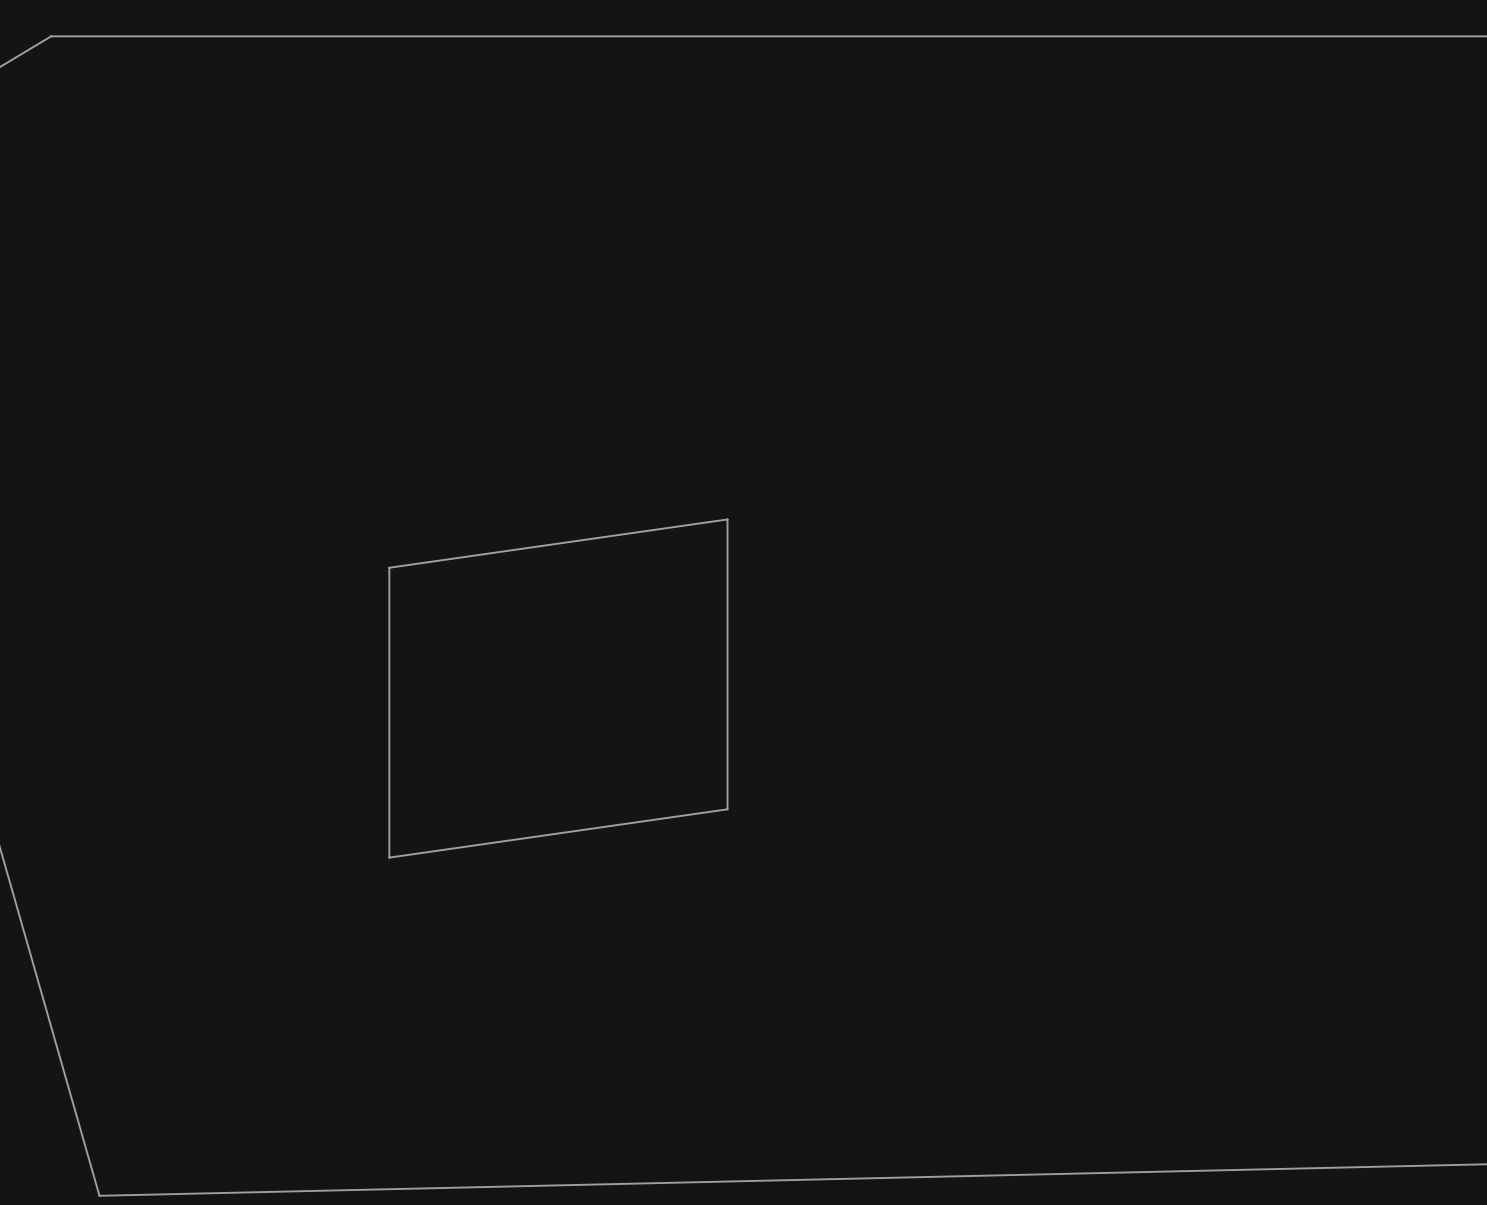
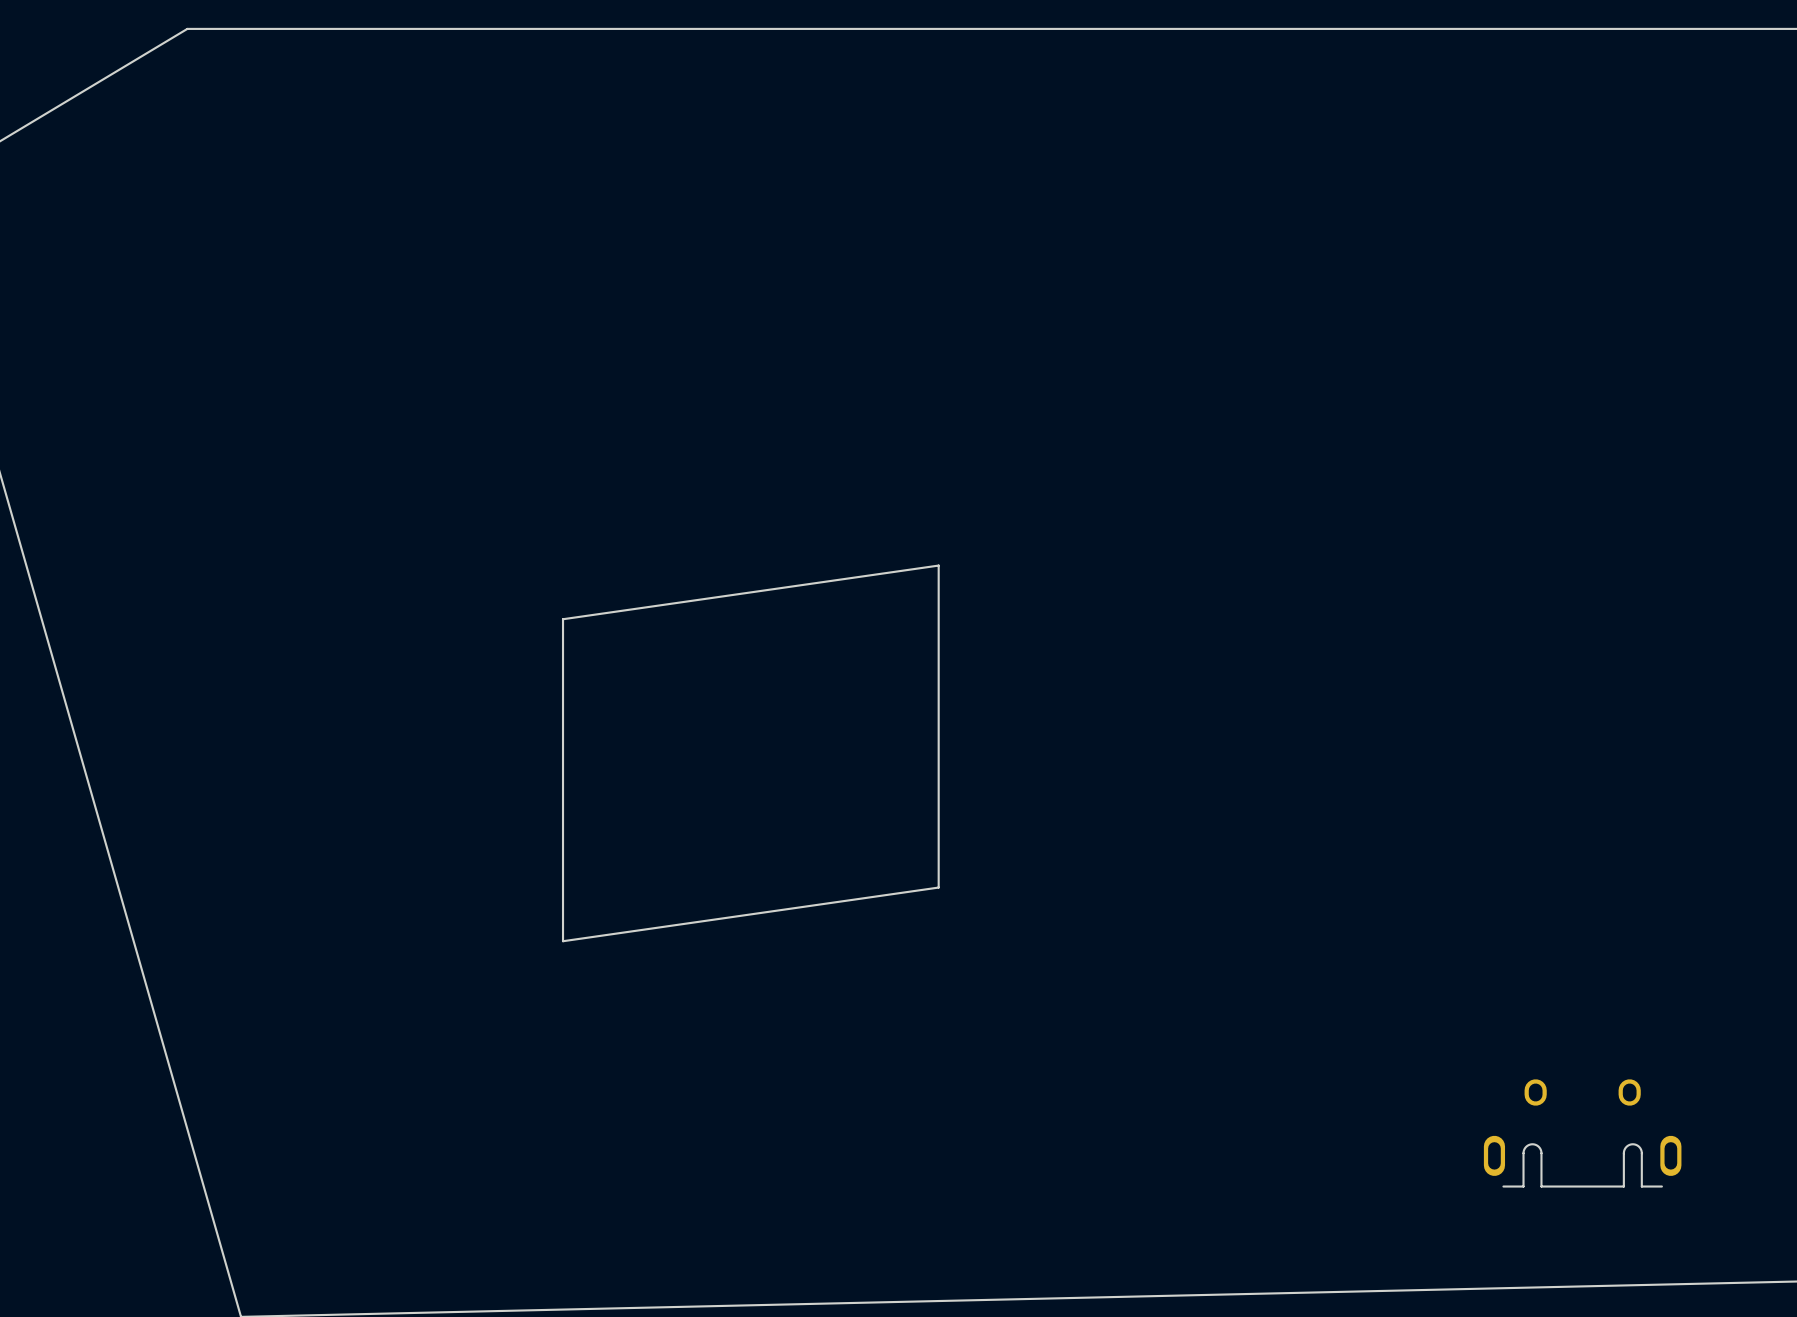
part: none -> (1582, 1133)

